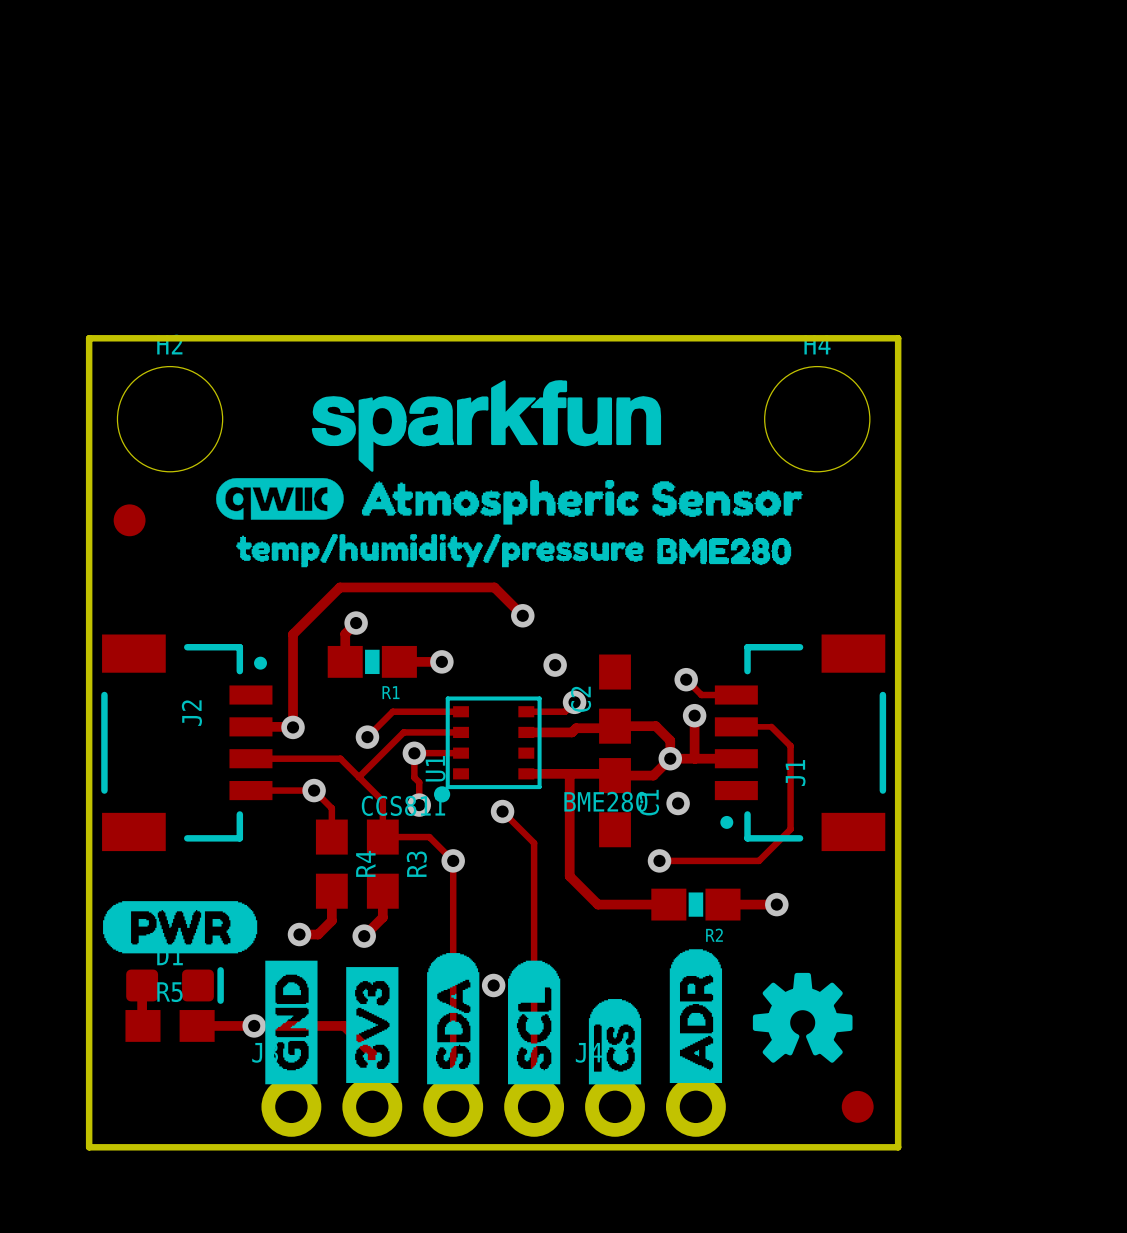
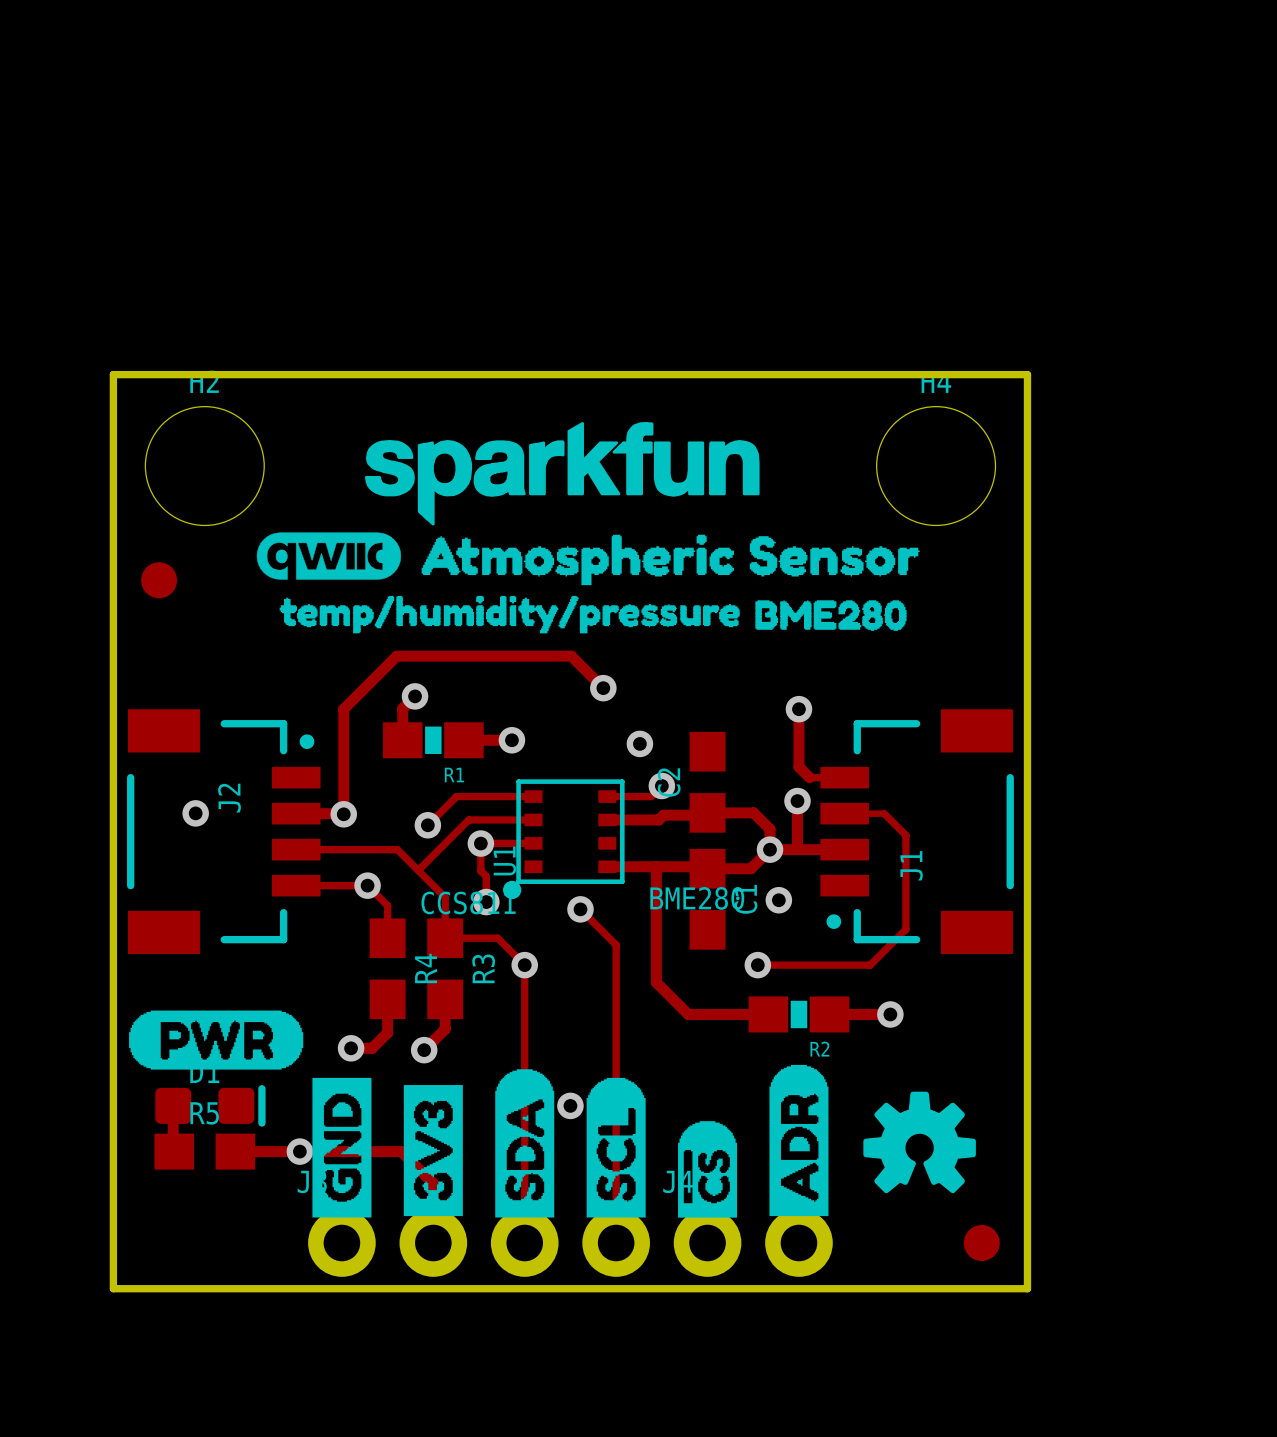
track: (686, 679) (701, 695) (705, 695) -> (798, 709) (798, 766) (809, 777)
via position: (686, 679) -> (798, 709)
via: none -> (195, 813)

